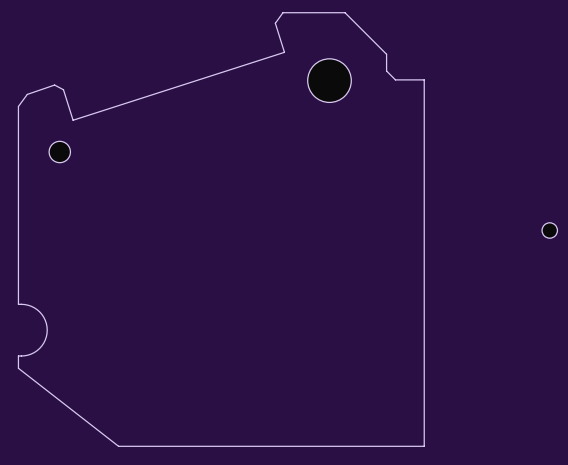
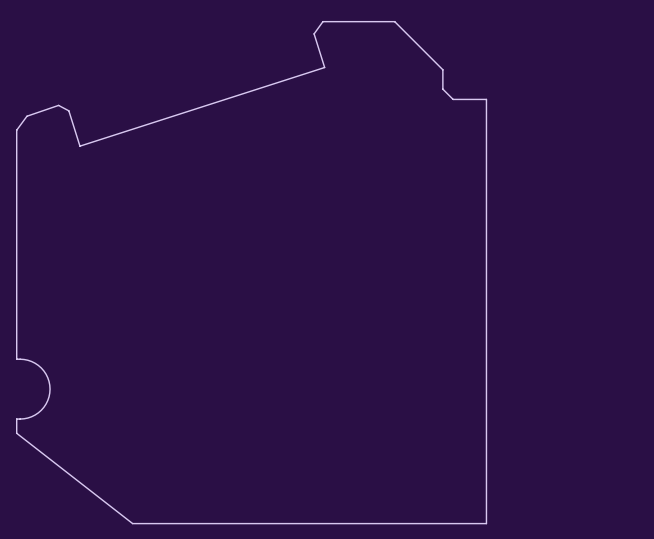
part: (329, 80) -> none
part: (59, 151) -> none
part: (549, 230) -> none

